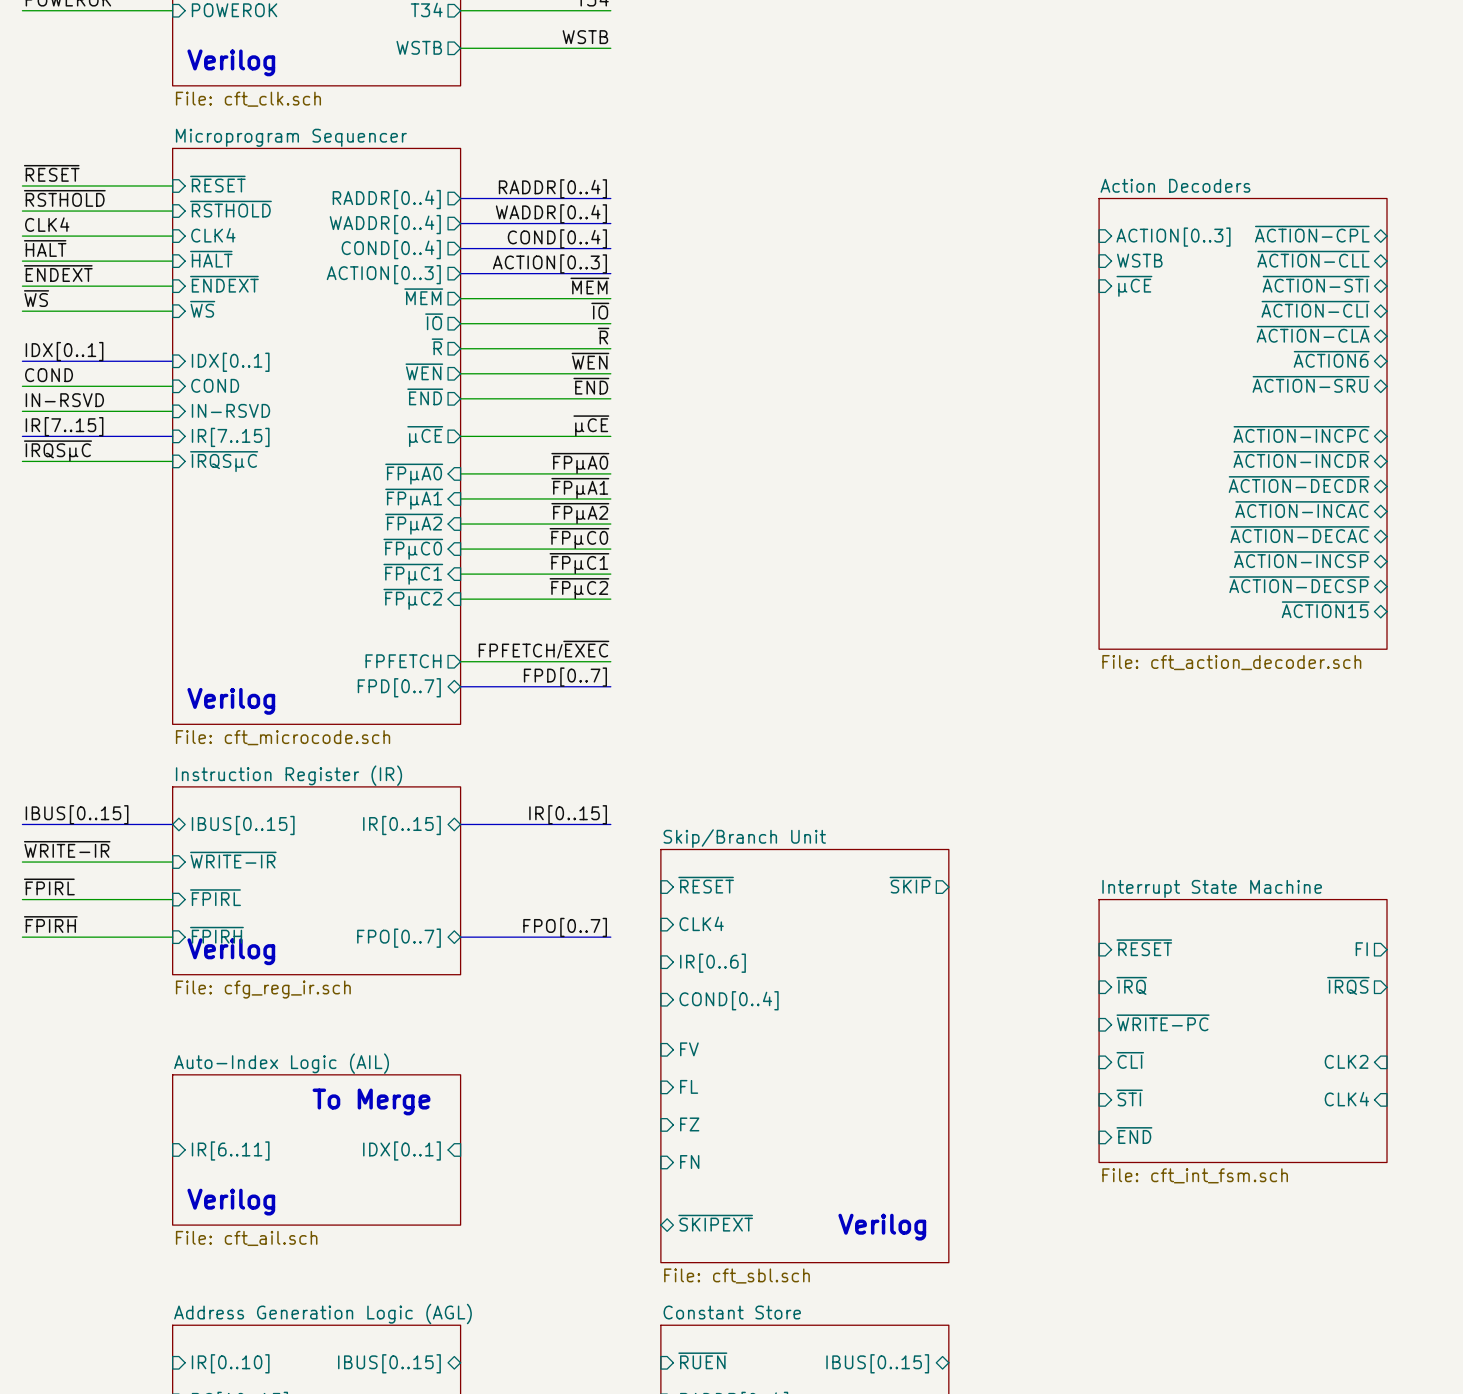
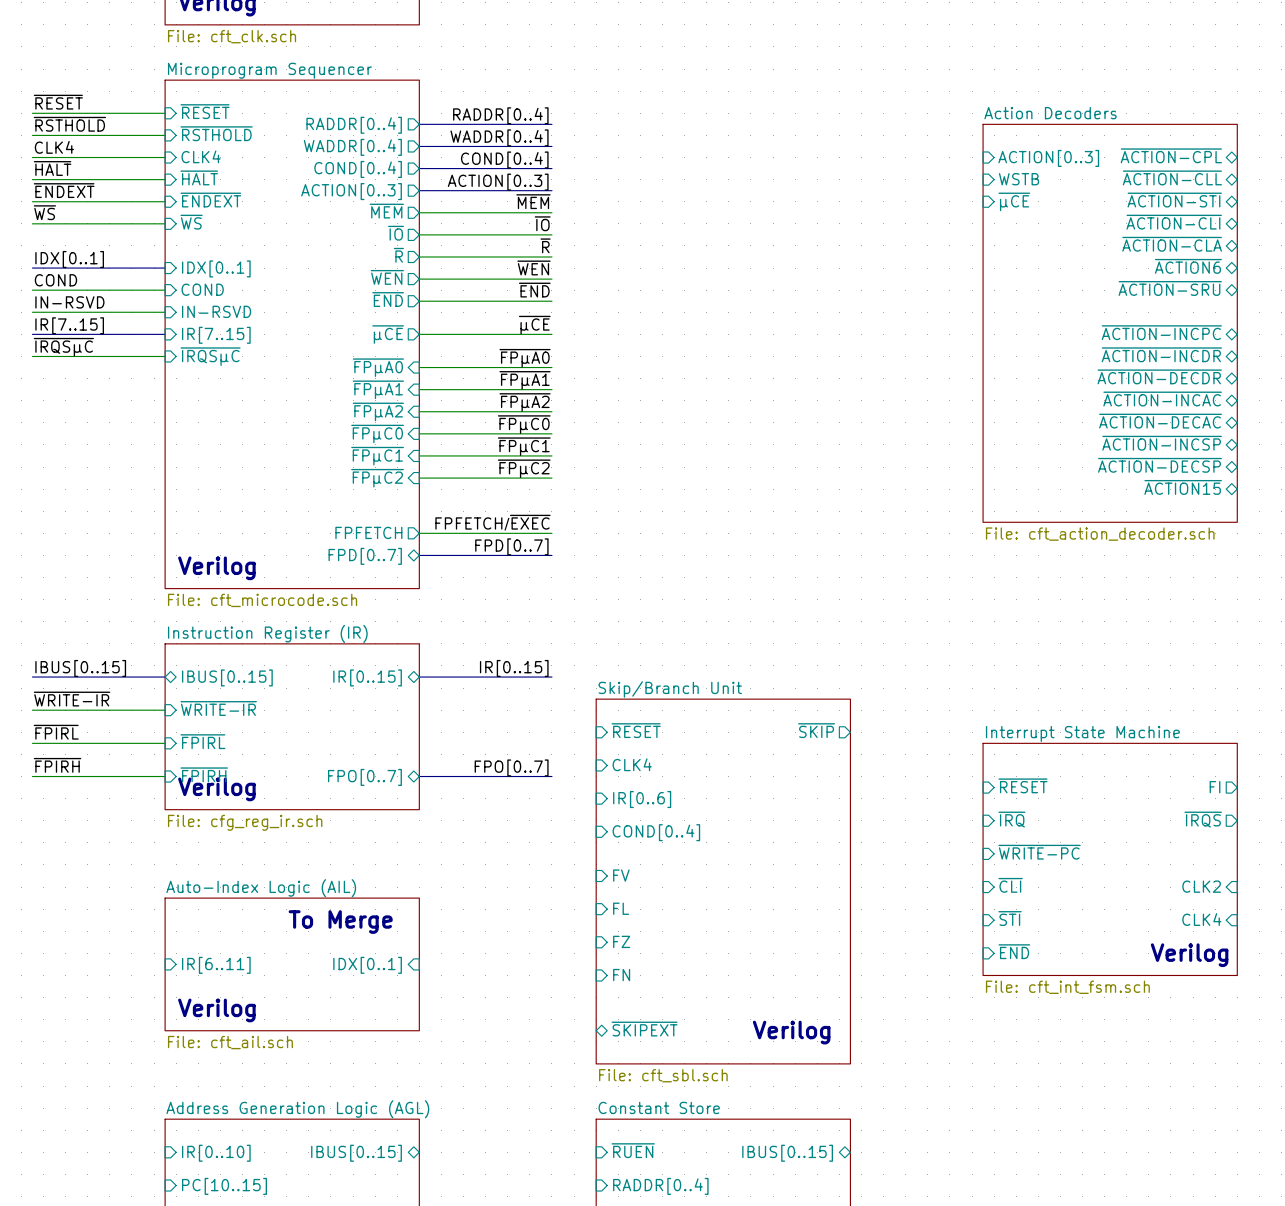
text: none -> Verilog (1189, 955)

